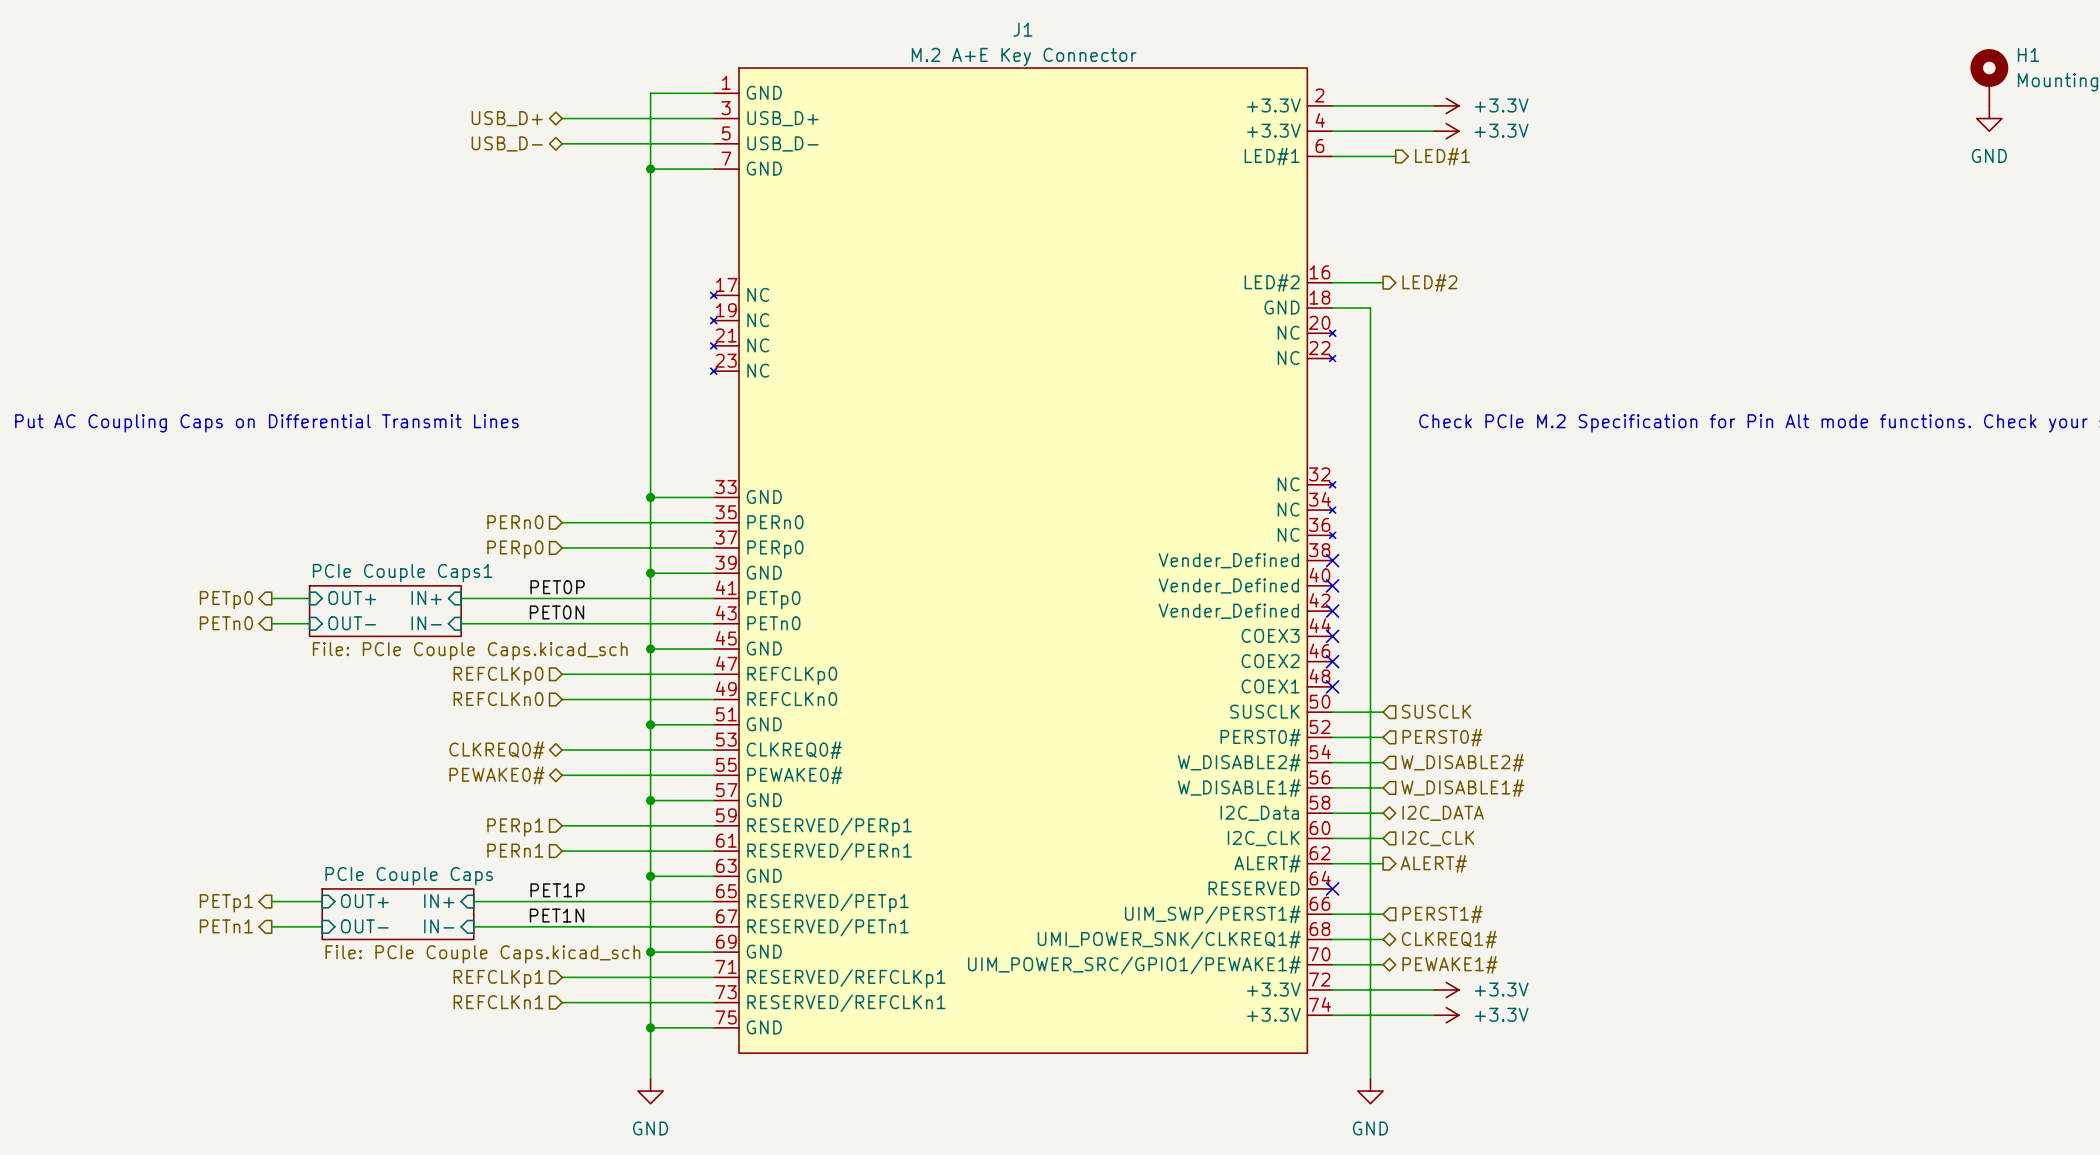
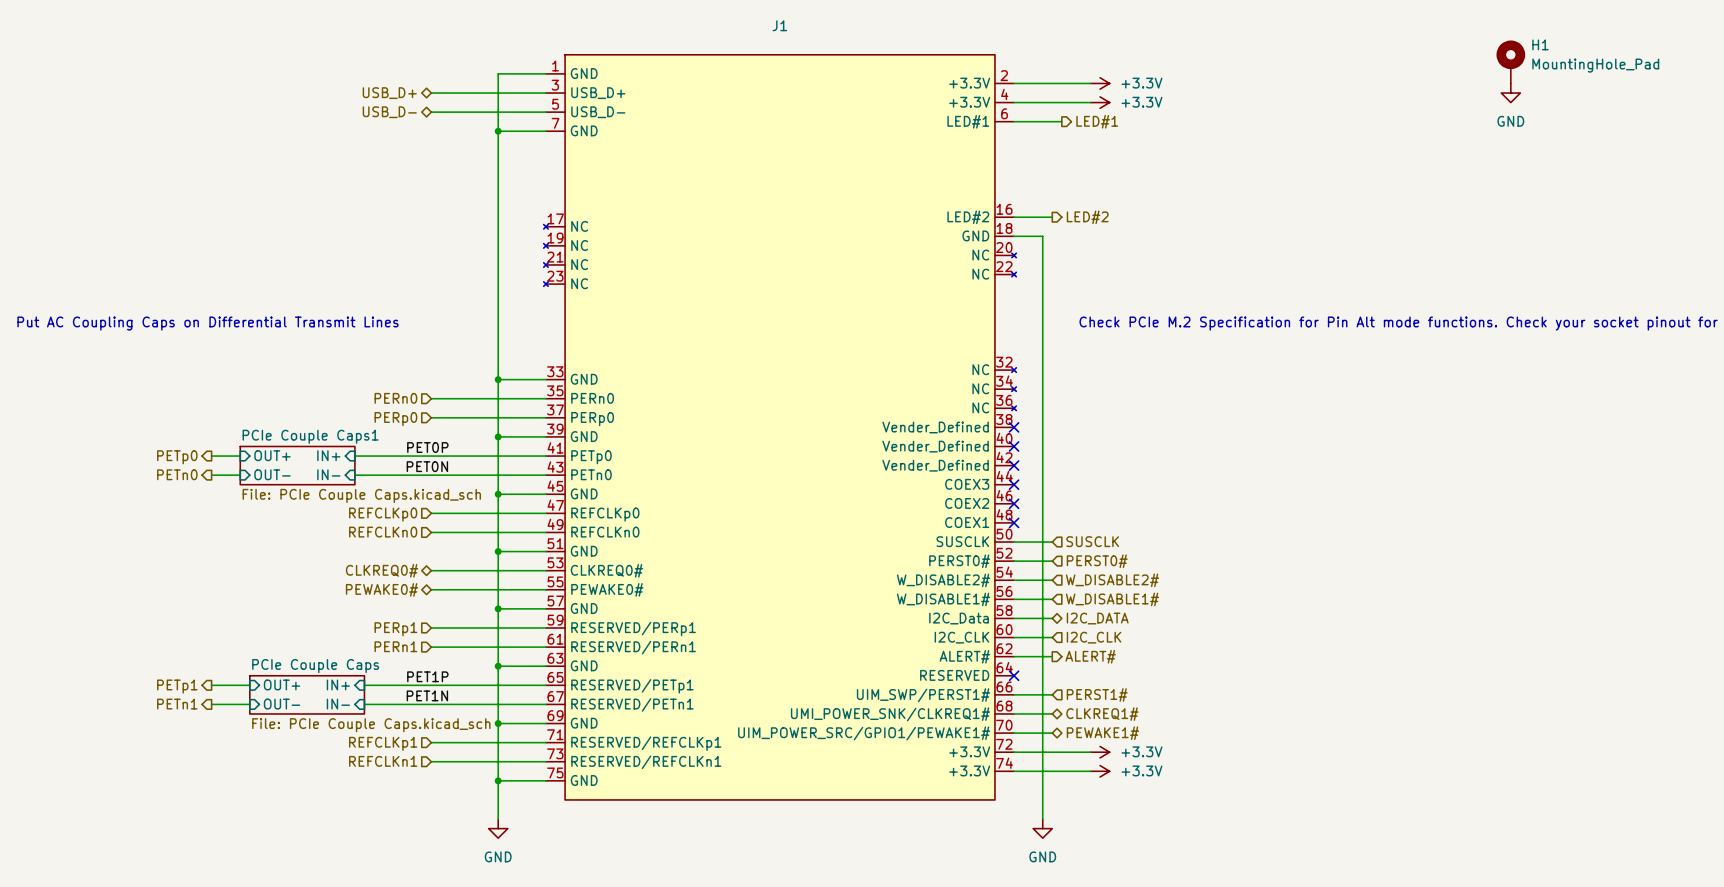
J1 value: M.2 A+E Key Connector (1024, 57) -> none

